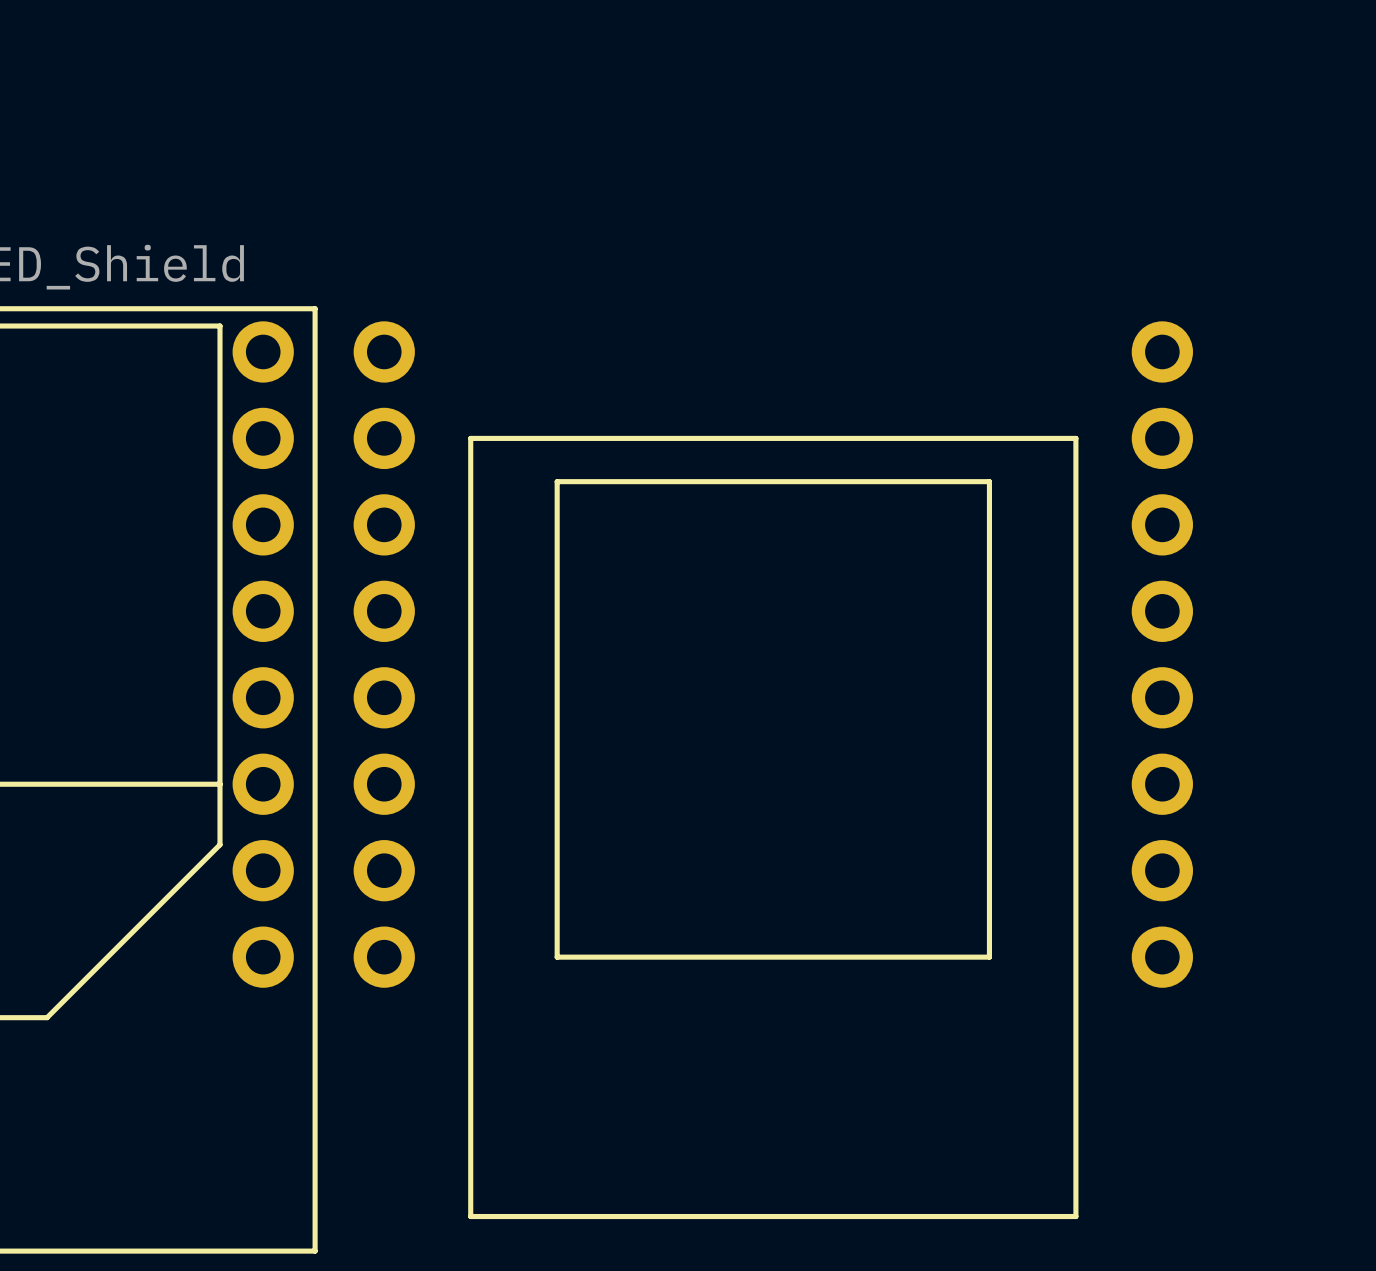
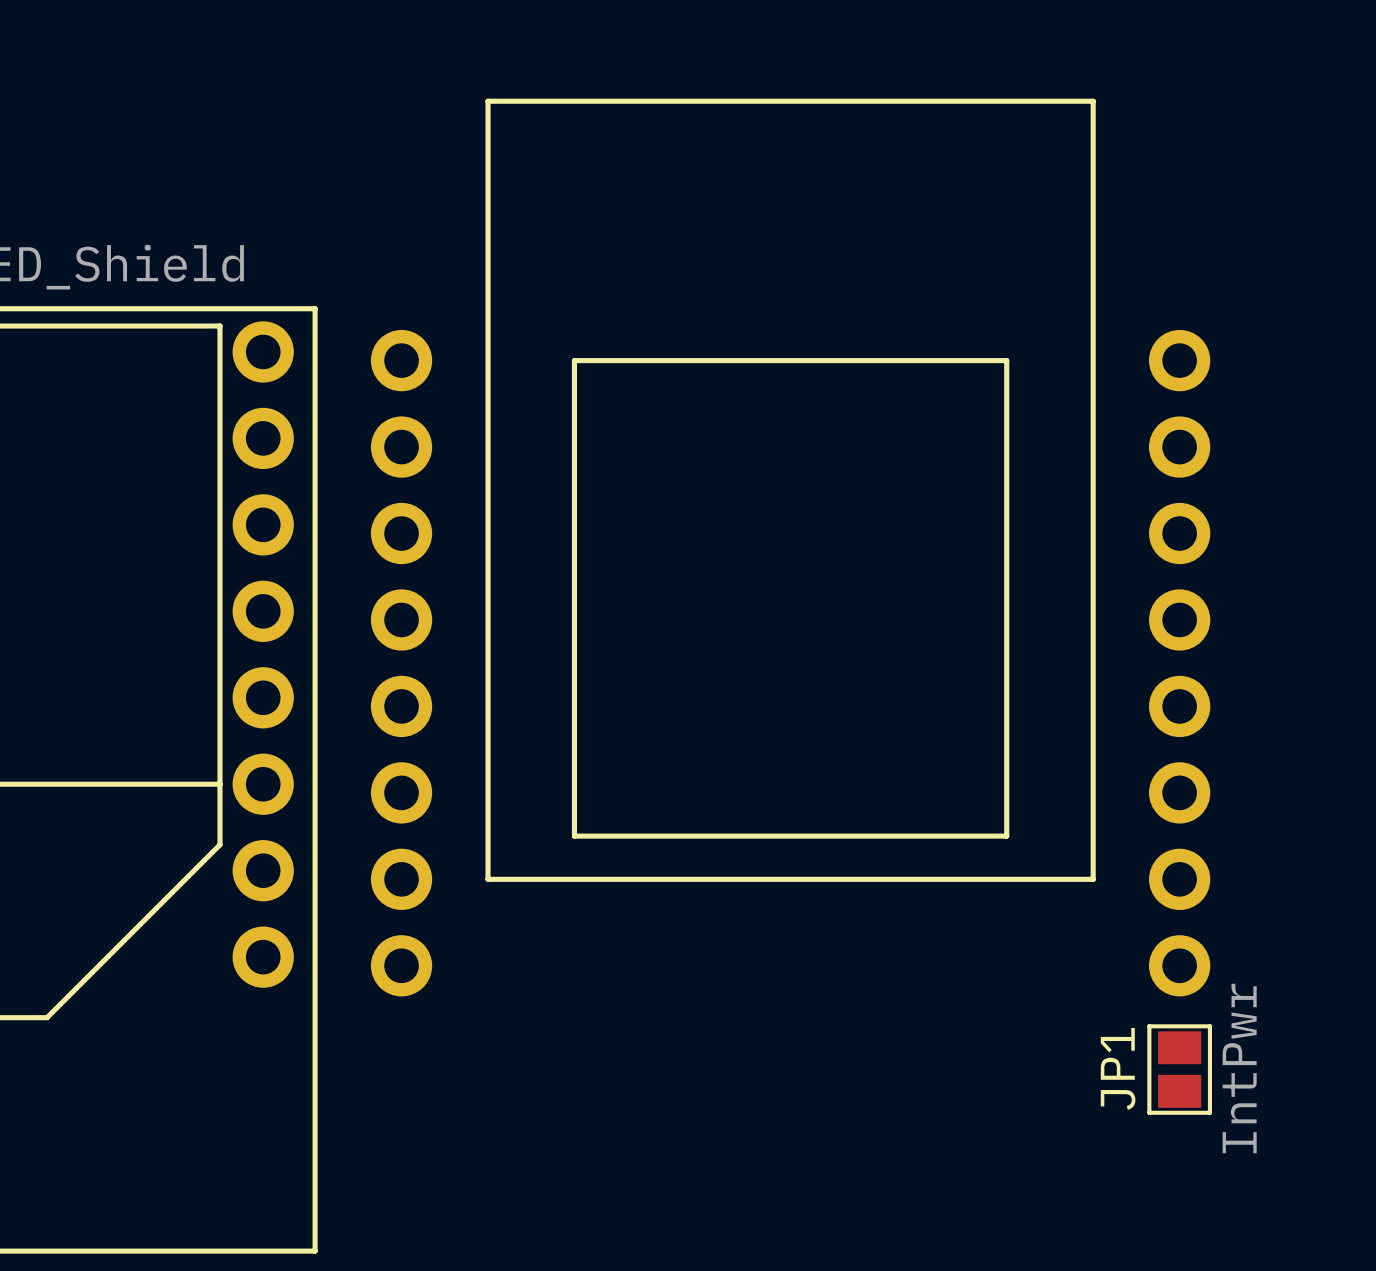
part rotation: 0° (773, 770) -> 180° (790, 547)
JP1: none -> IntPwr (1179, 1069)

